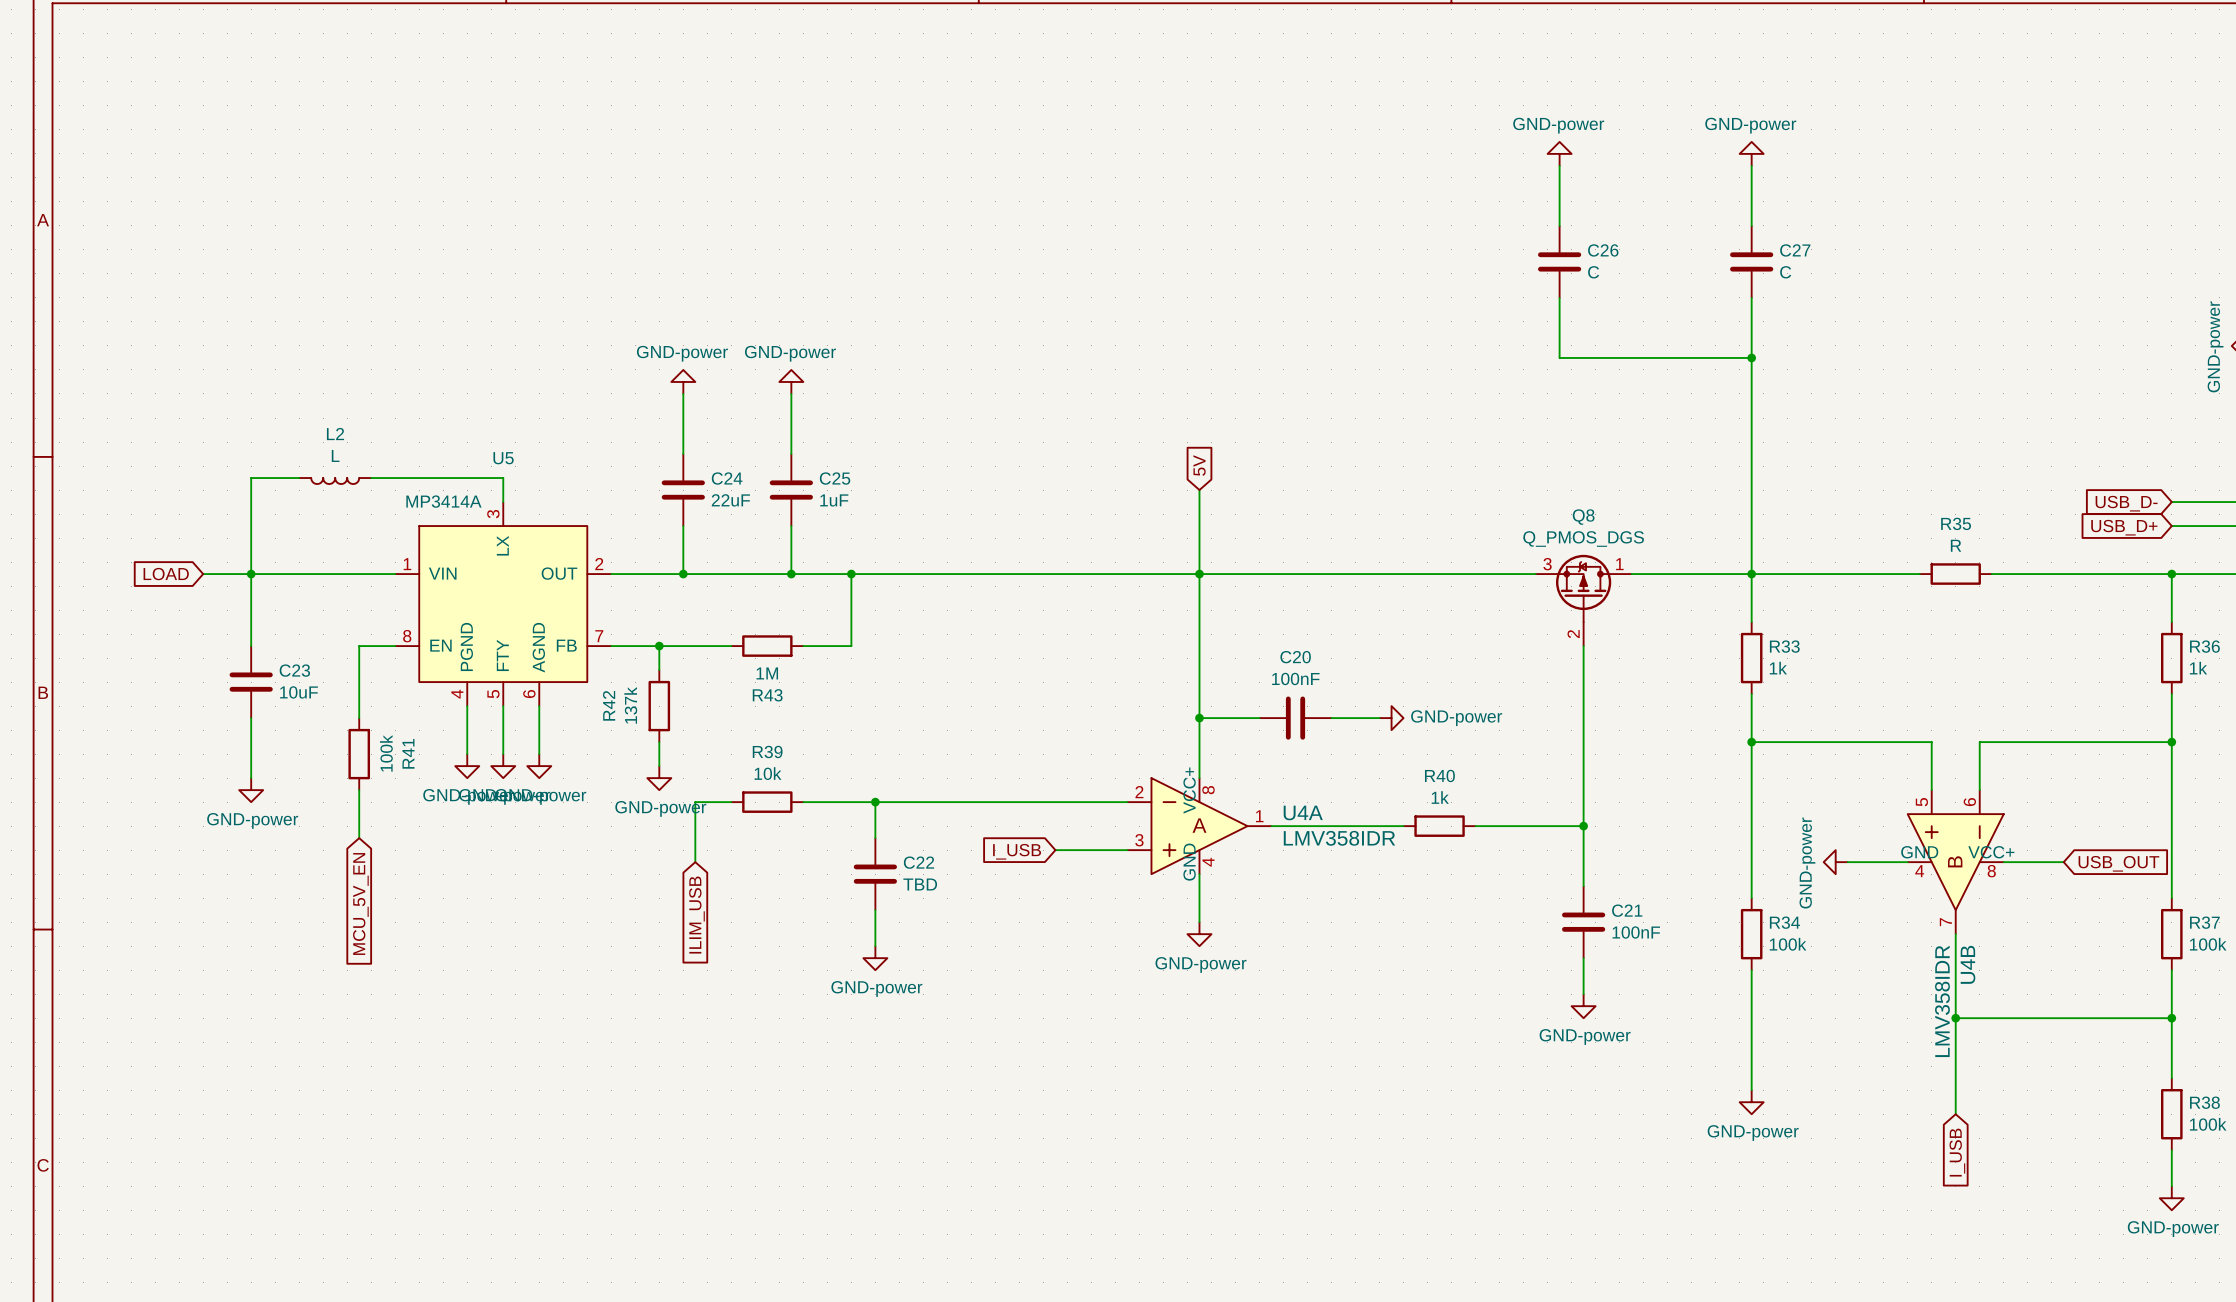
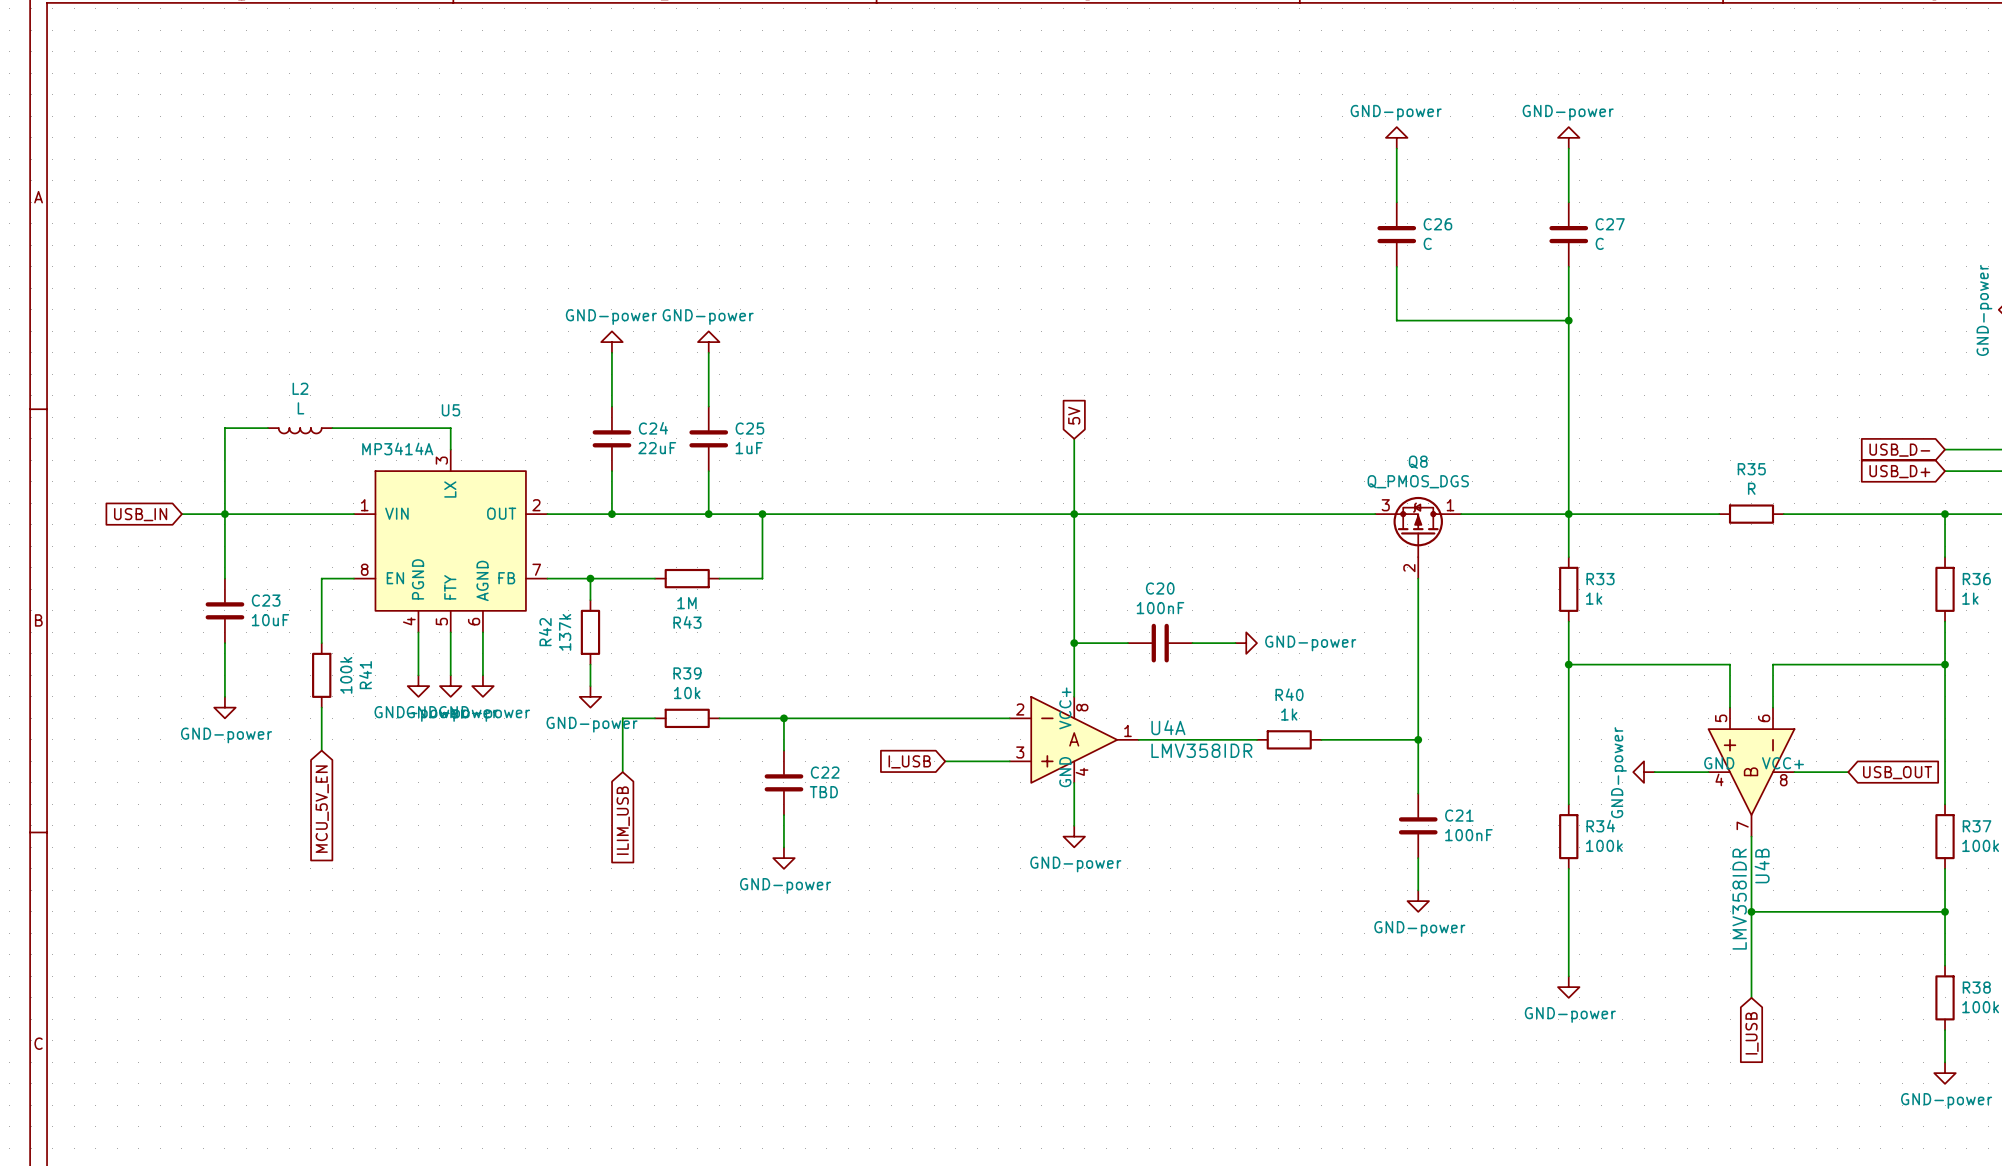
global label: LOAD (166, 574) -> USB_IN (140, 514)

